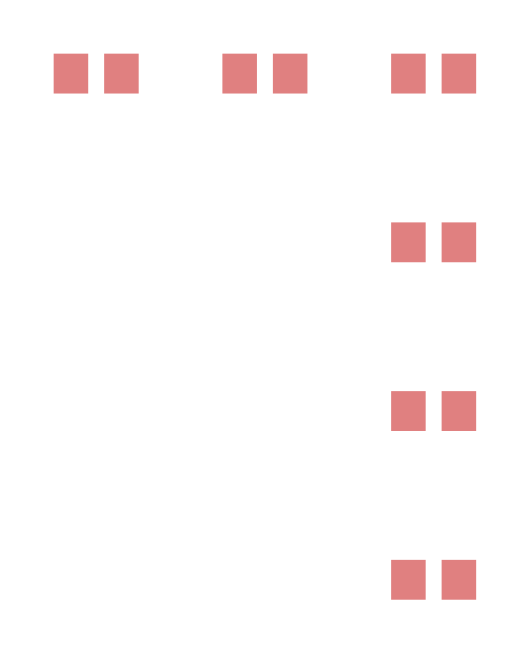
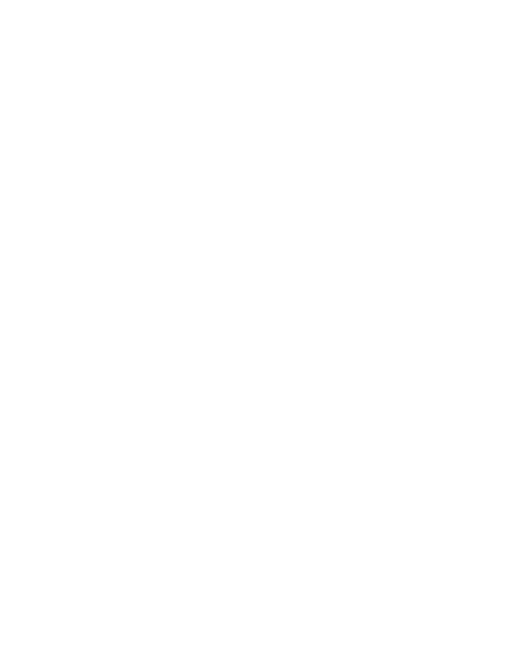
part: (96, 73) -> none
part: (264, 73) -> none
part: (433, 73) -> none
part: (433, 242) -> none
part: (433, 411) -> none
part: (433, 579) -> none

